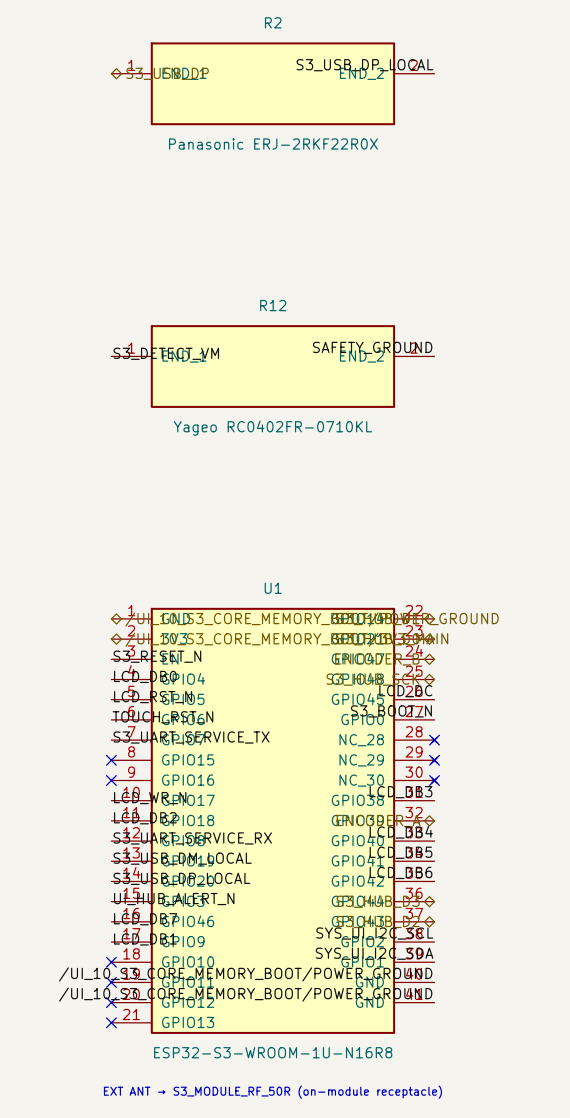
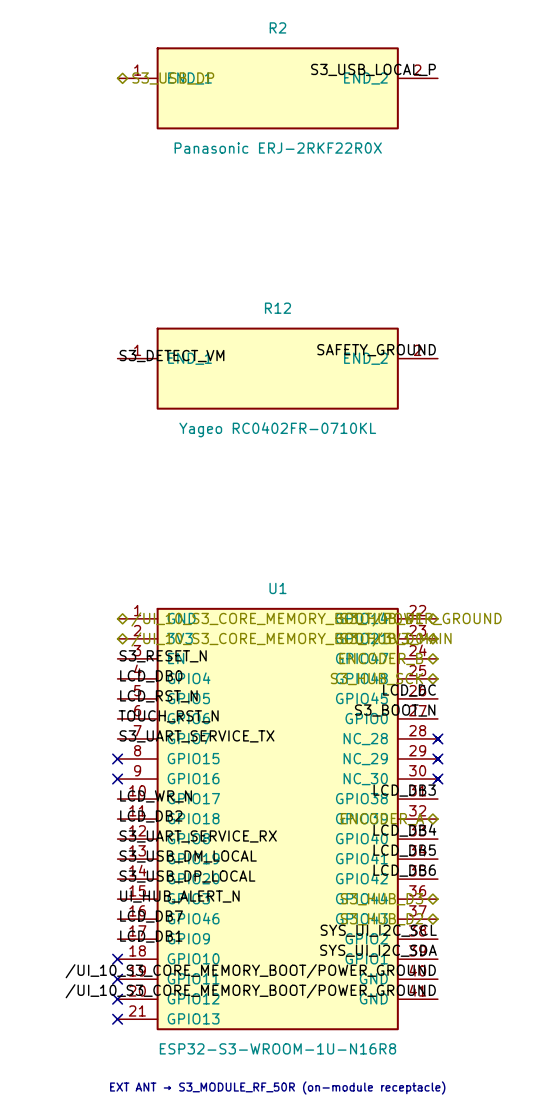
label: S3_USB_DP_LOCAL (364, 65) -> S3_USB_LOCAL_P (373, 69)

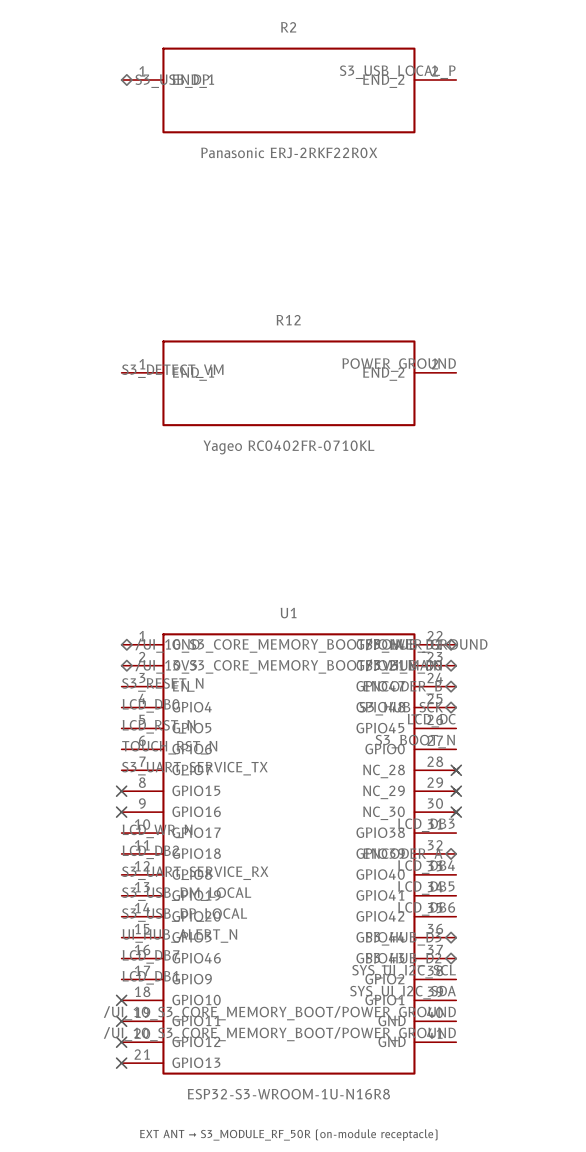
label: SAFETY_GROUND (376, 350) -> POWER_GROUND (399, 365)

